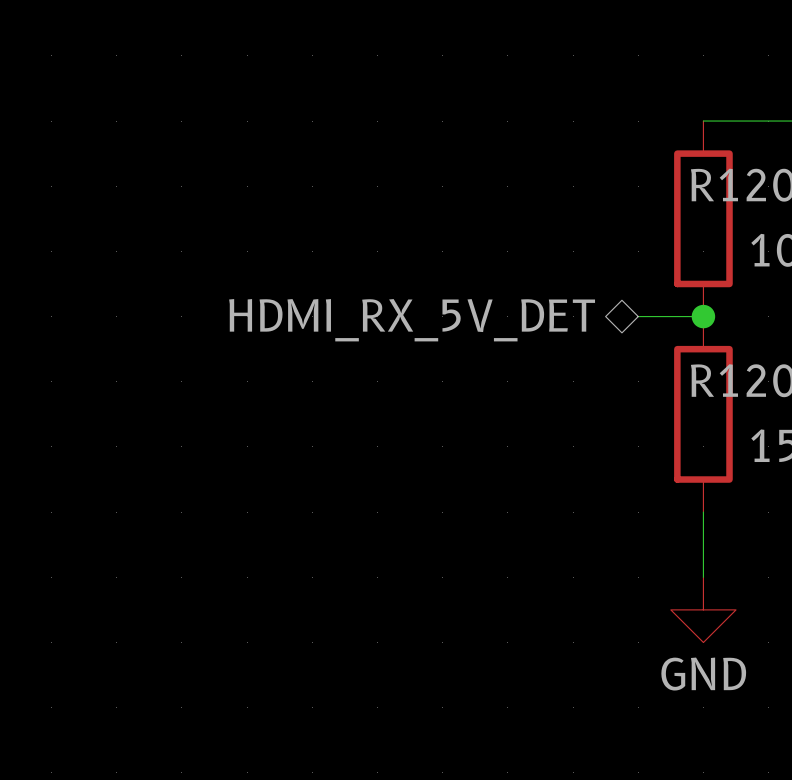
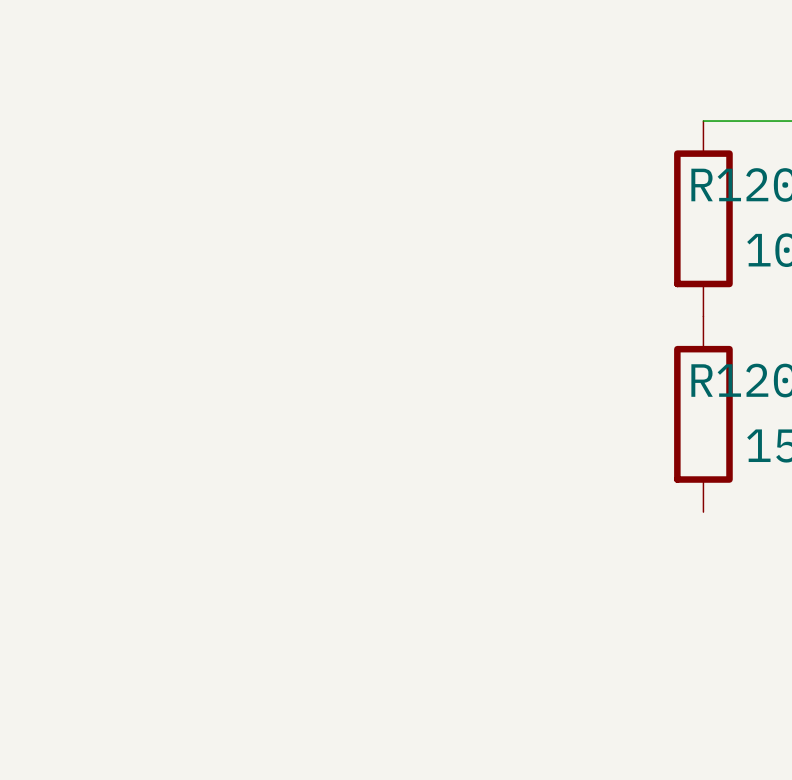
wire: (638, 316) (703, 316) -> none
junction: (703, 316) -> none
hierarchical label: HDMI_RX_5V_DET (412, 320) -> none
wire: (703, 512) (703, 577) -> none
power symbol: GND (703, 609) -> none

